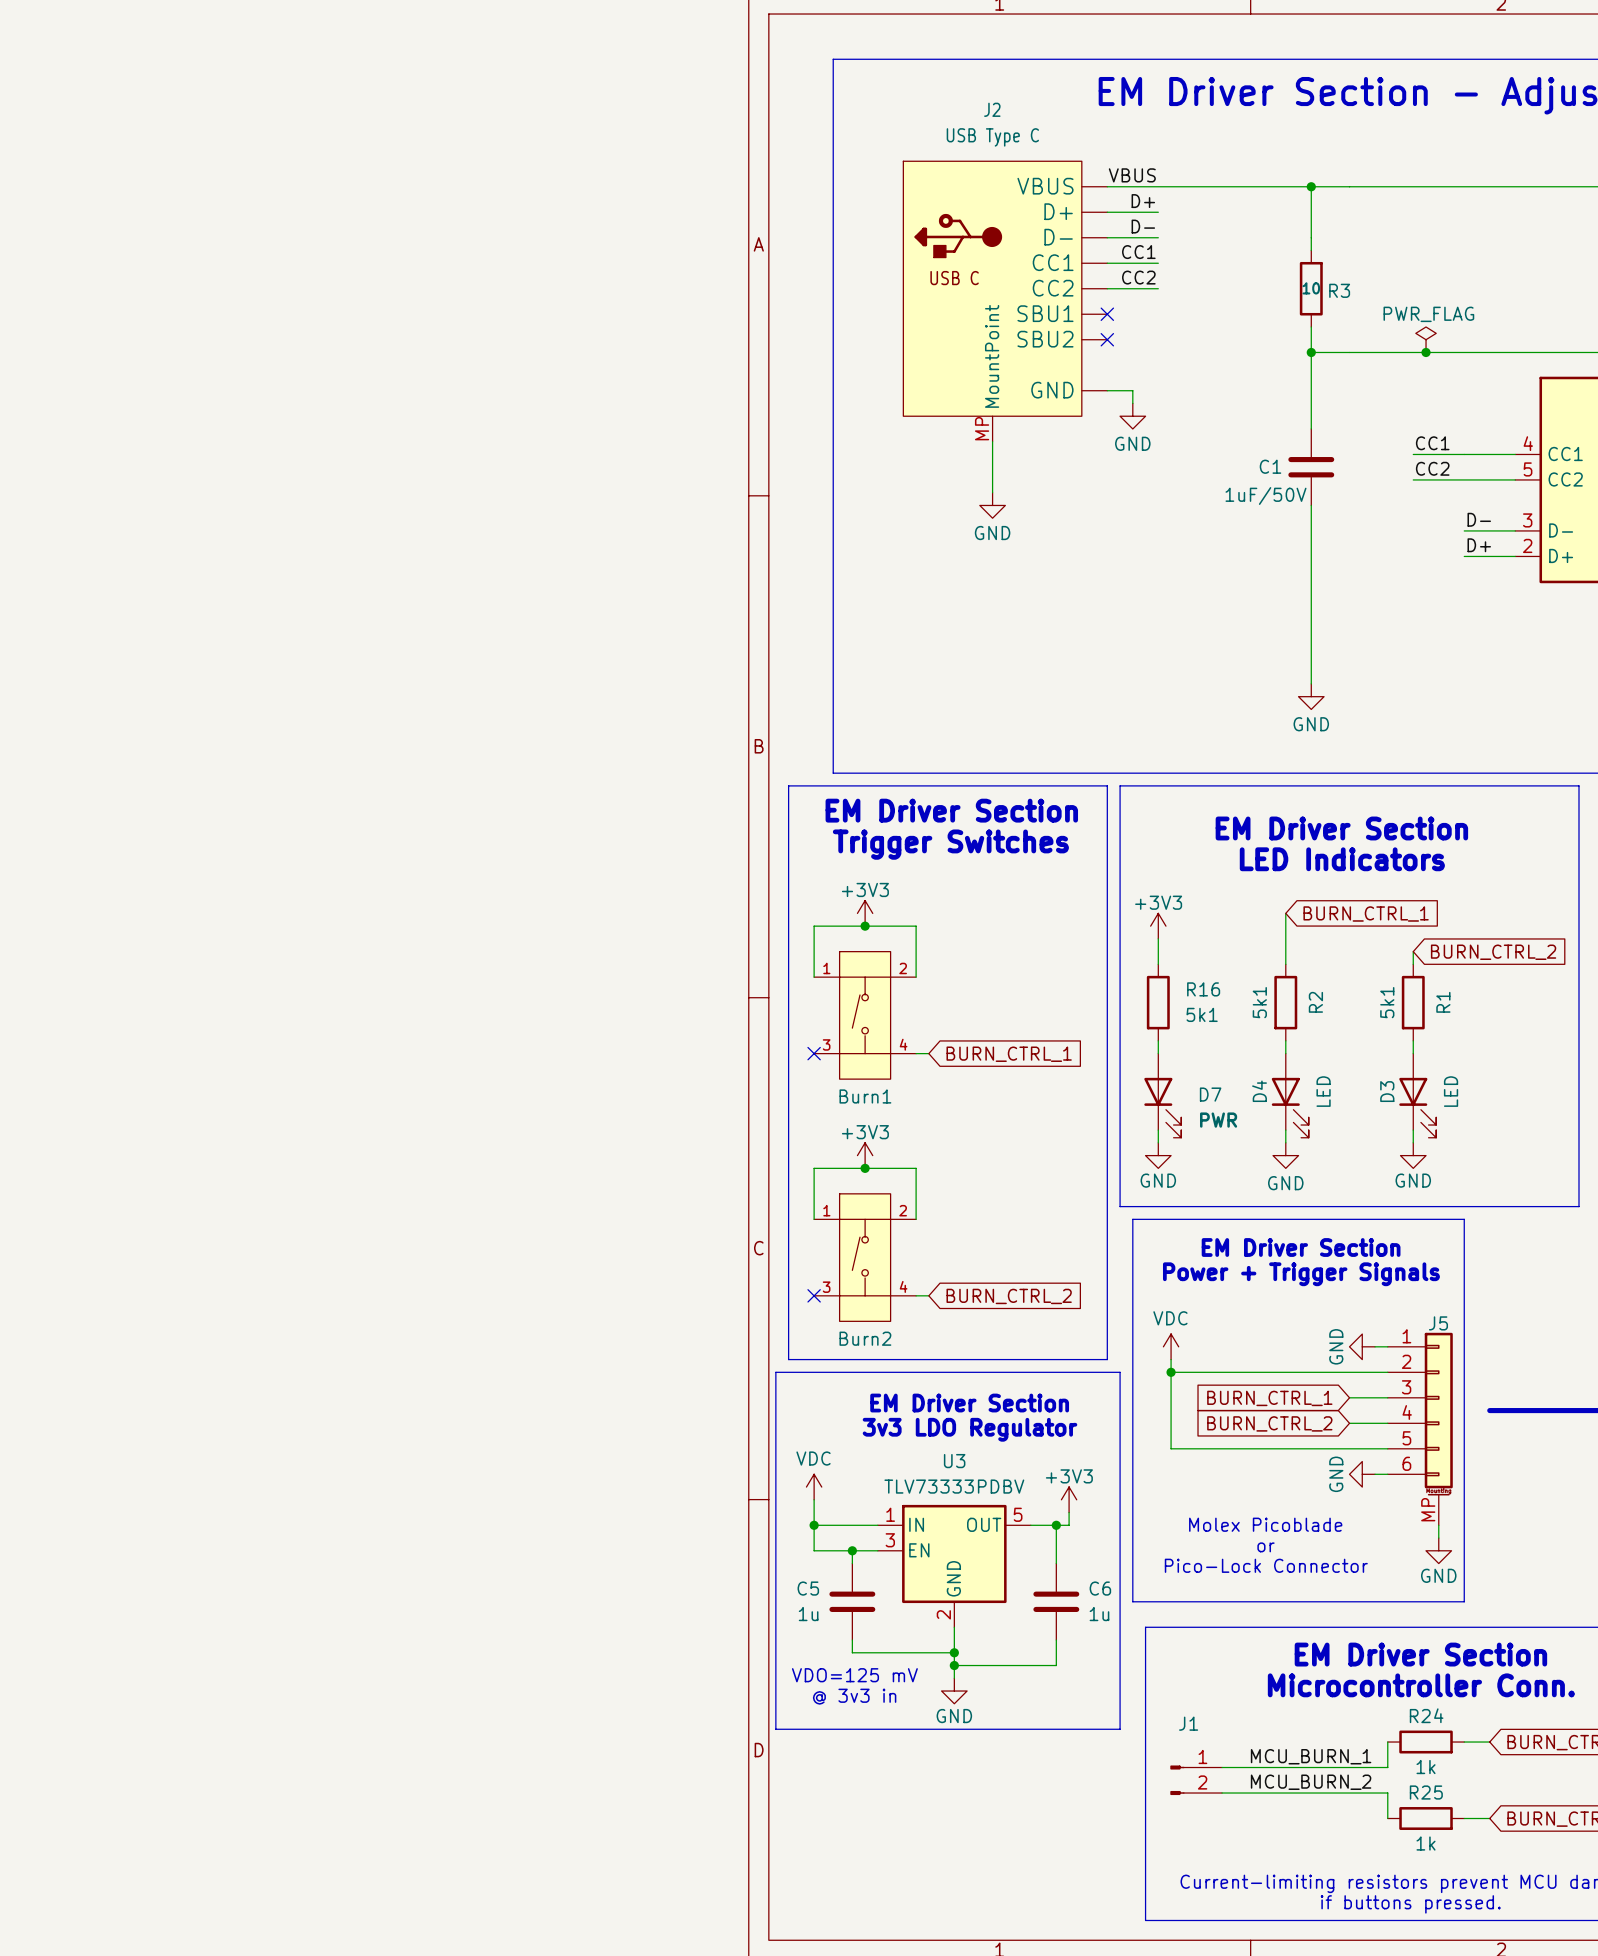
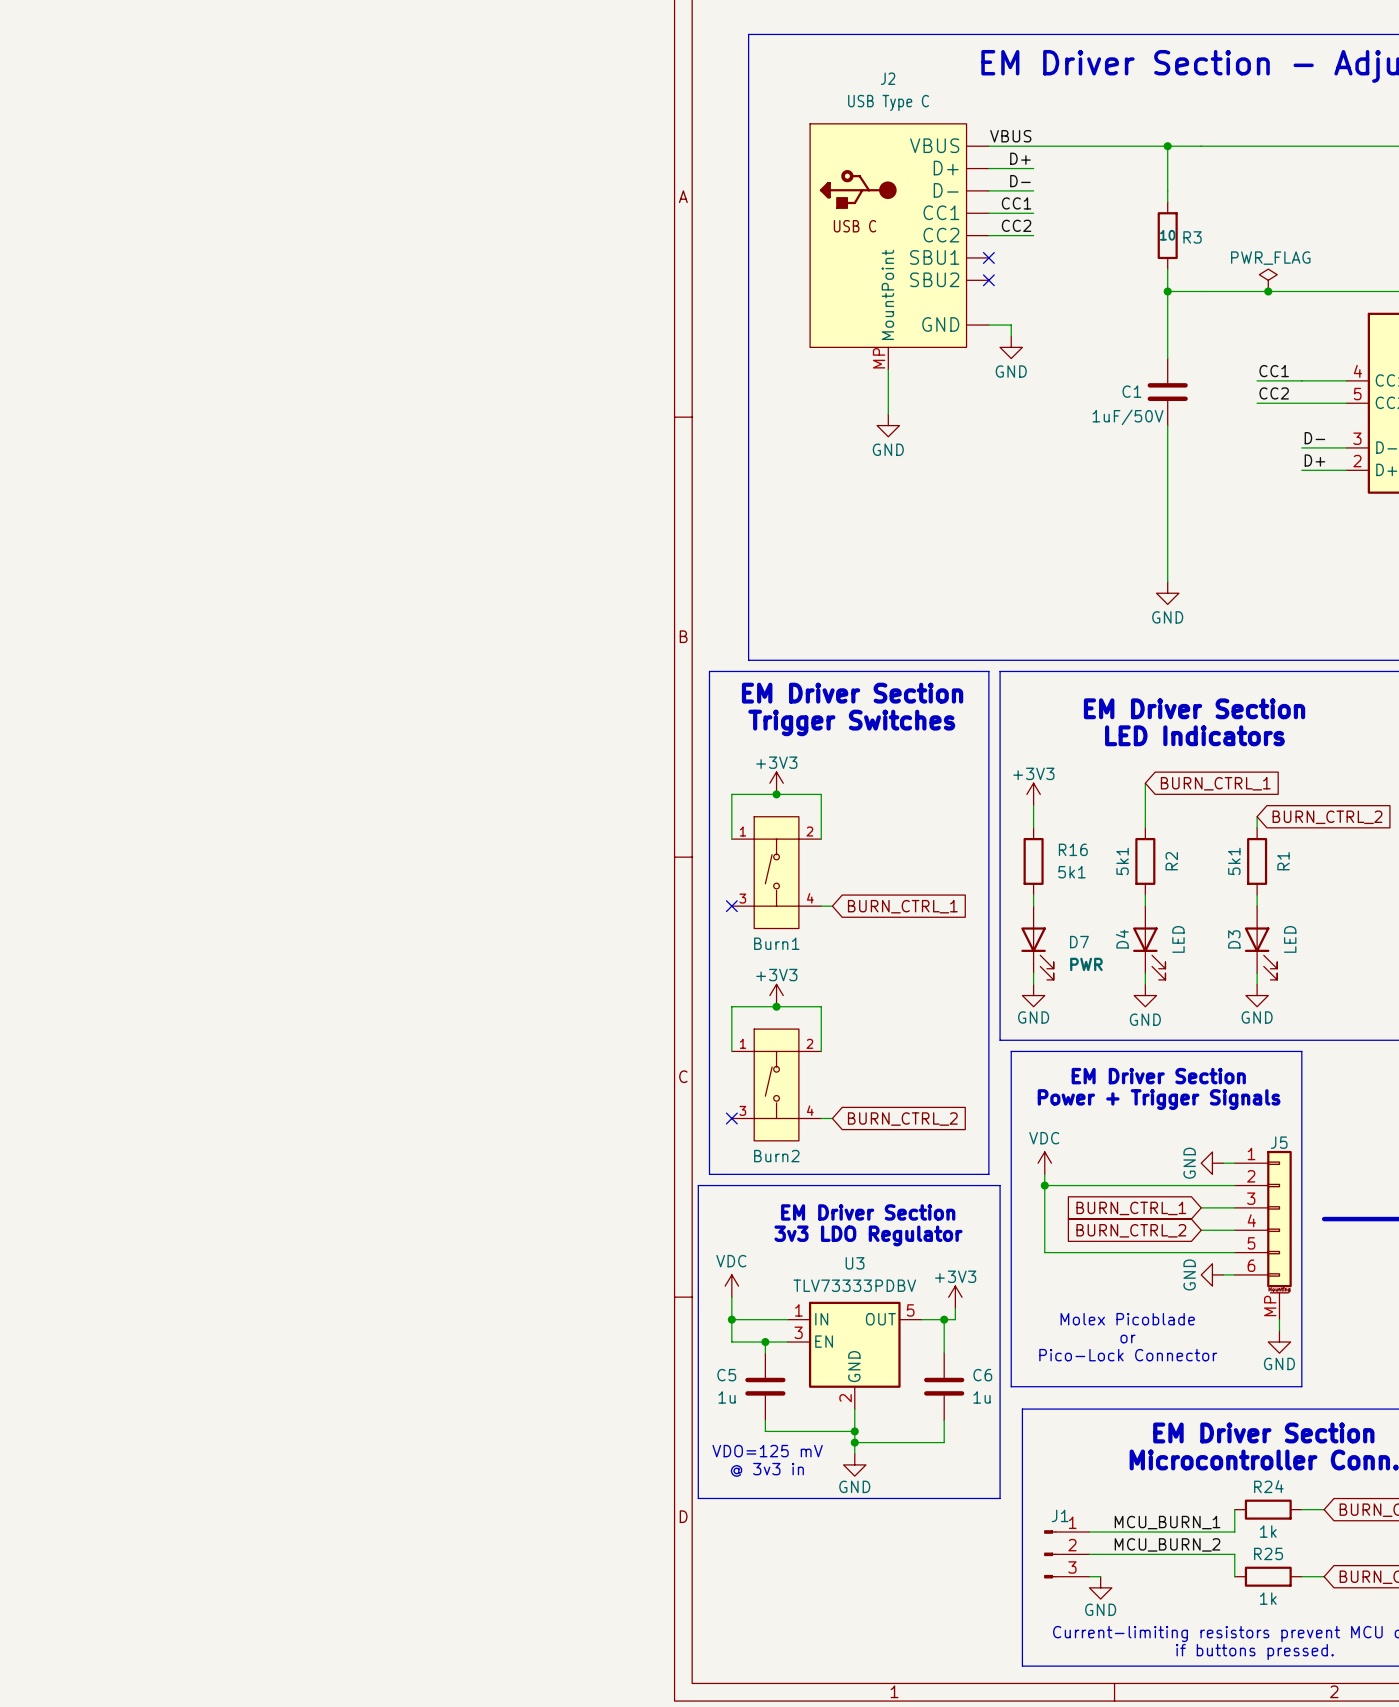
J1 symbol: [1170, 1765, 1223, 1796] -> [1044, 1530, 1090, 1579]
wire: none -> (1089, 1576) (1100, 1576)
power symbol: none -> GND (1100, 1587)

